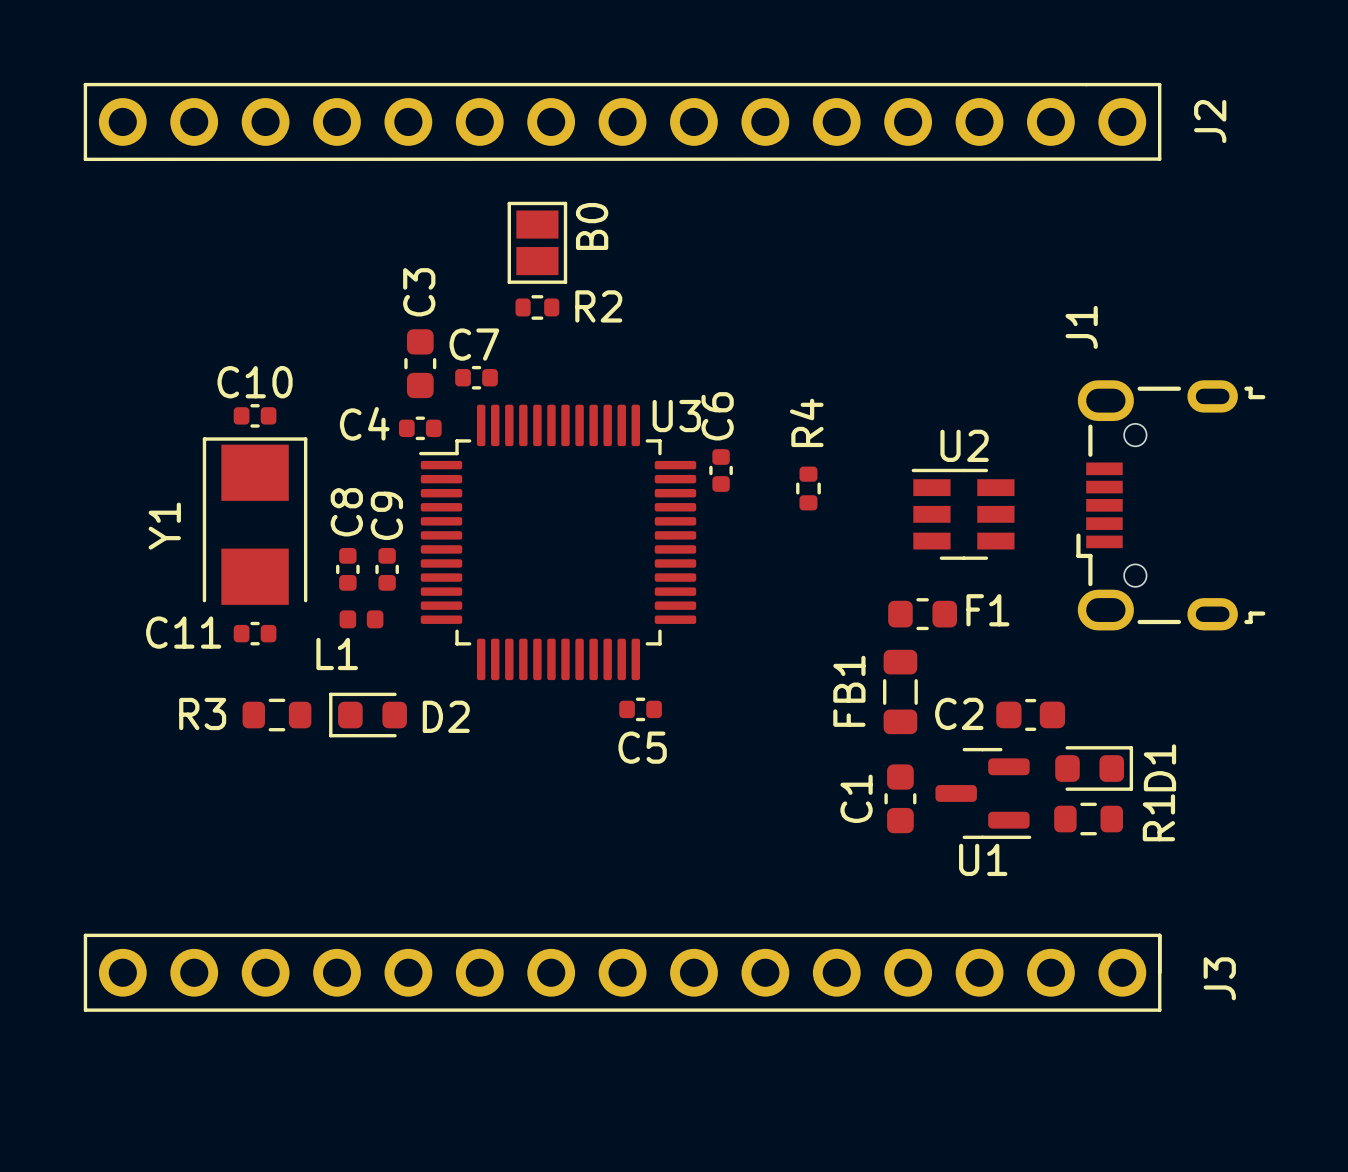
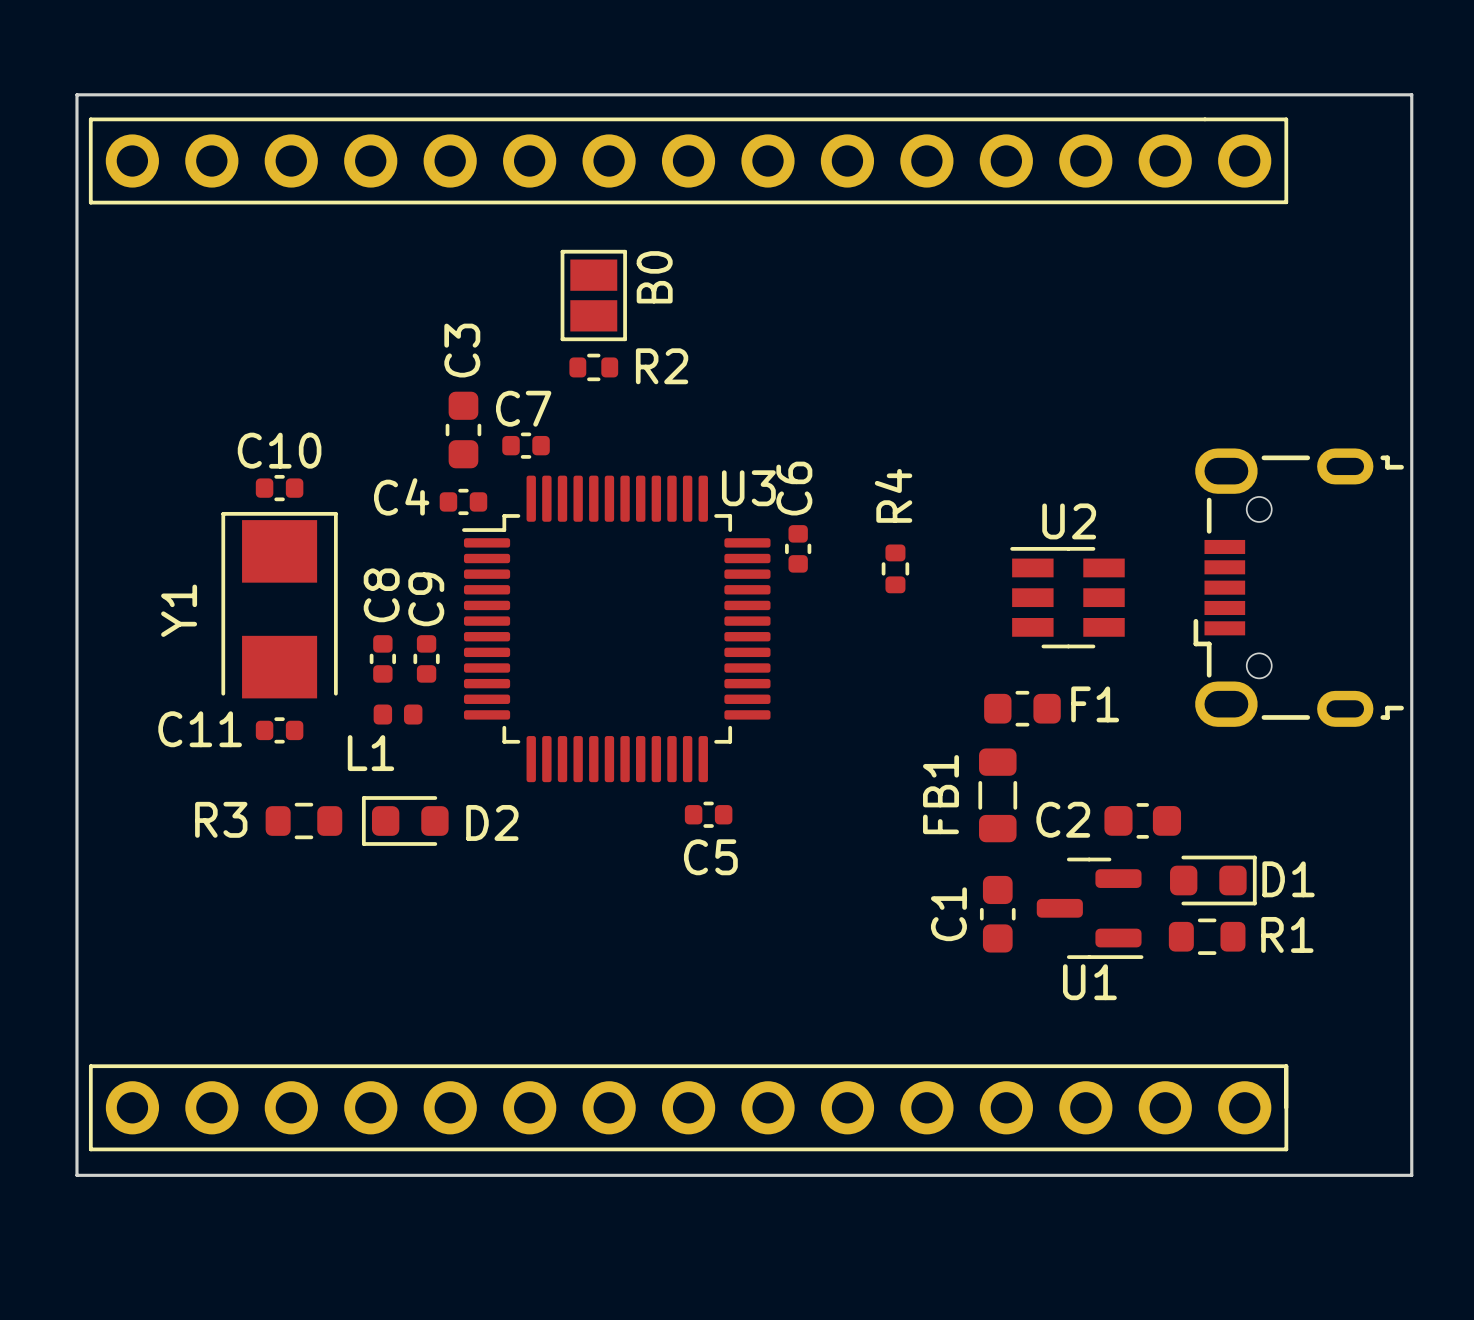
board edge: none -> (76, 94) (1411, 94) (1411, 1175) (76, 1175) (76, 94)
J2 name: J2 (1210, 121) -> none
J1 name: J1 (1081, 327) -> none
D1 name rotation: 0° (1159, 767) -> 90° clockwise (1288, 879)
R1 name rotation: 0° (1158, 817) -> 90° clockwise (1287, 934)
J3 name: J3 (1219, 978) -> none

